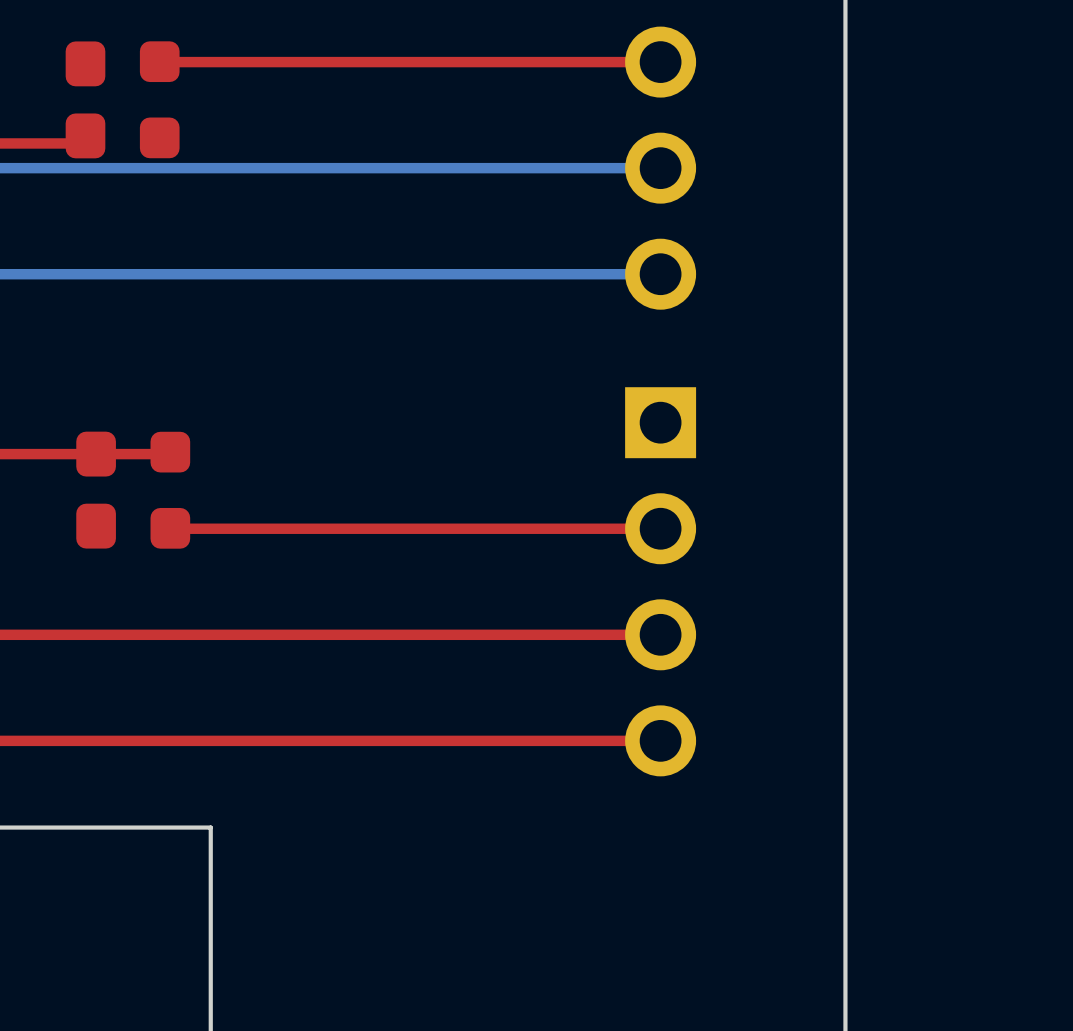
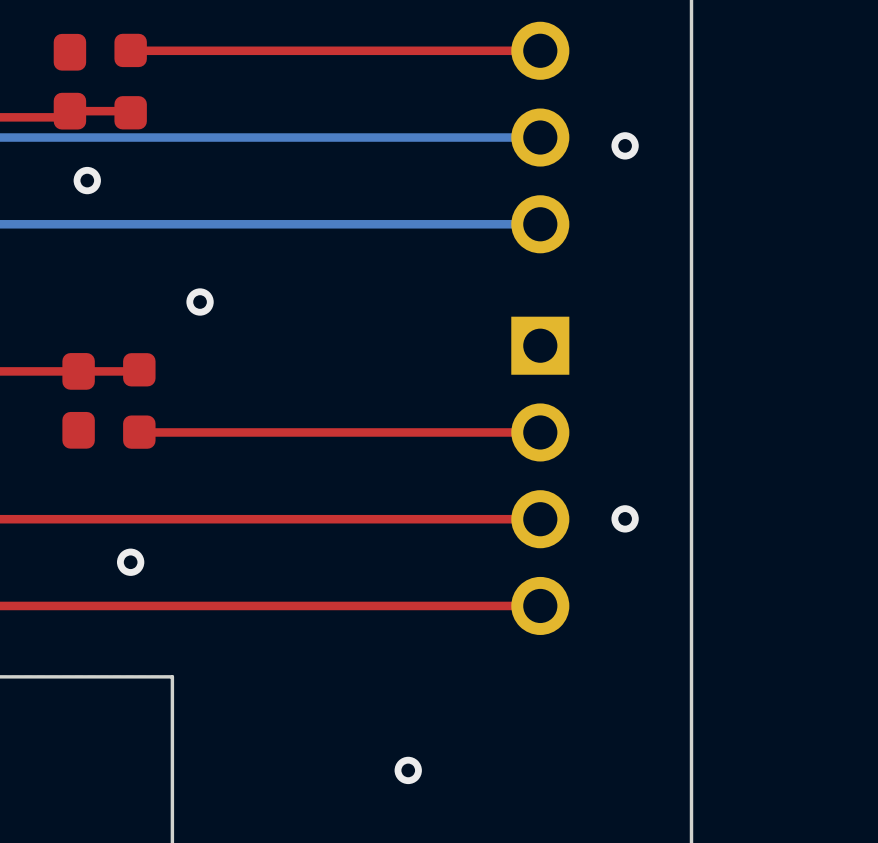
top track: none -> (69, 111) (129, 111) (130, 112)
via: none -> (625, 145)
via: none -> (87, 180)
via: none -> (200, 302)
via: none -> (625, 518)
via: none -> (130, 562)
via: none -> (408, 770)

